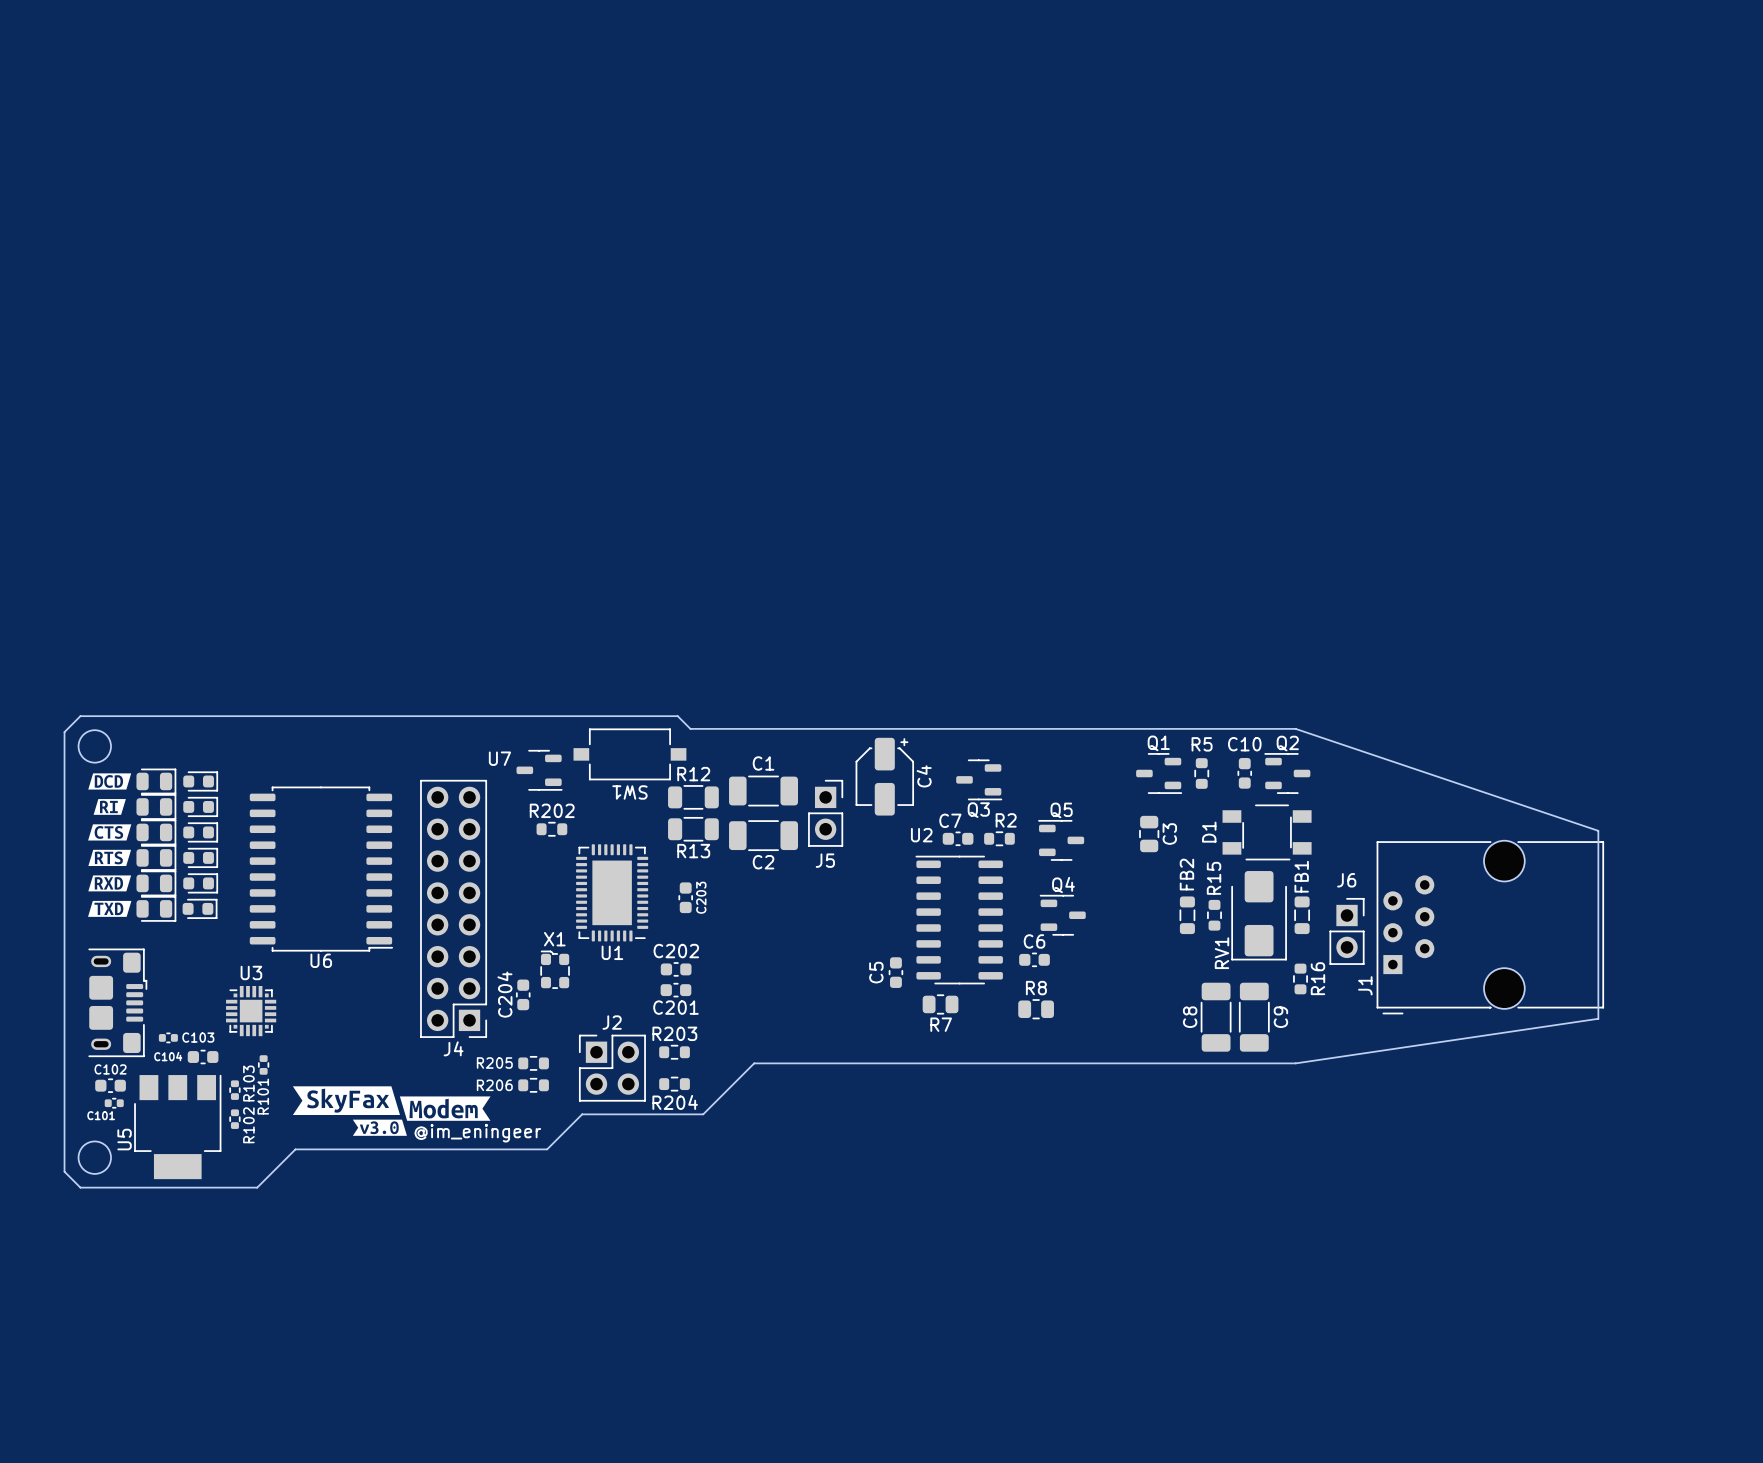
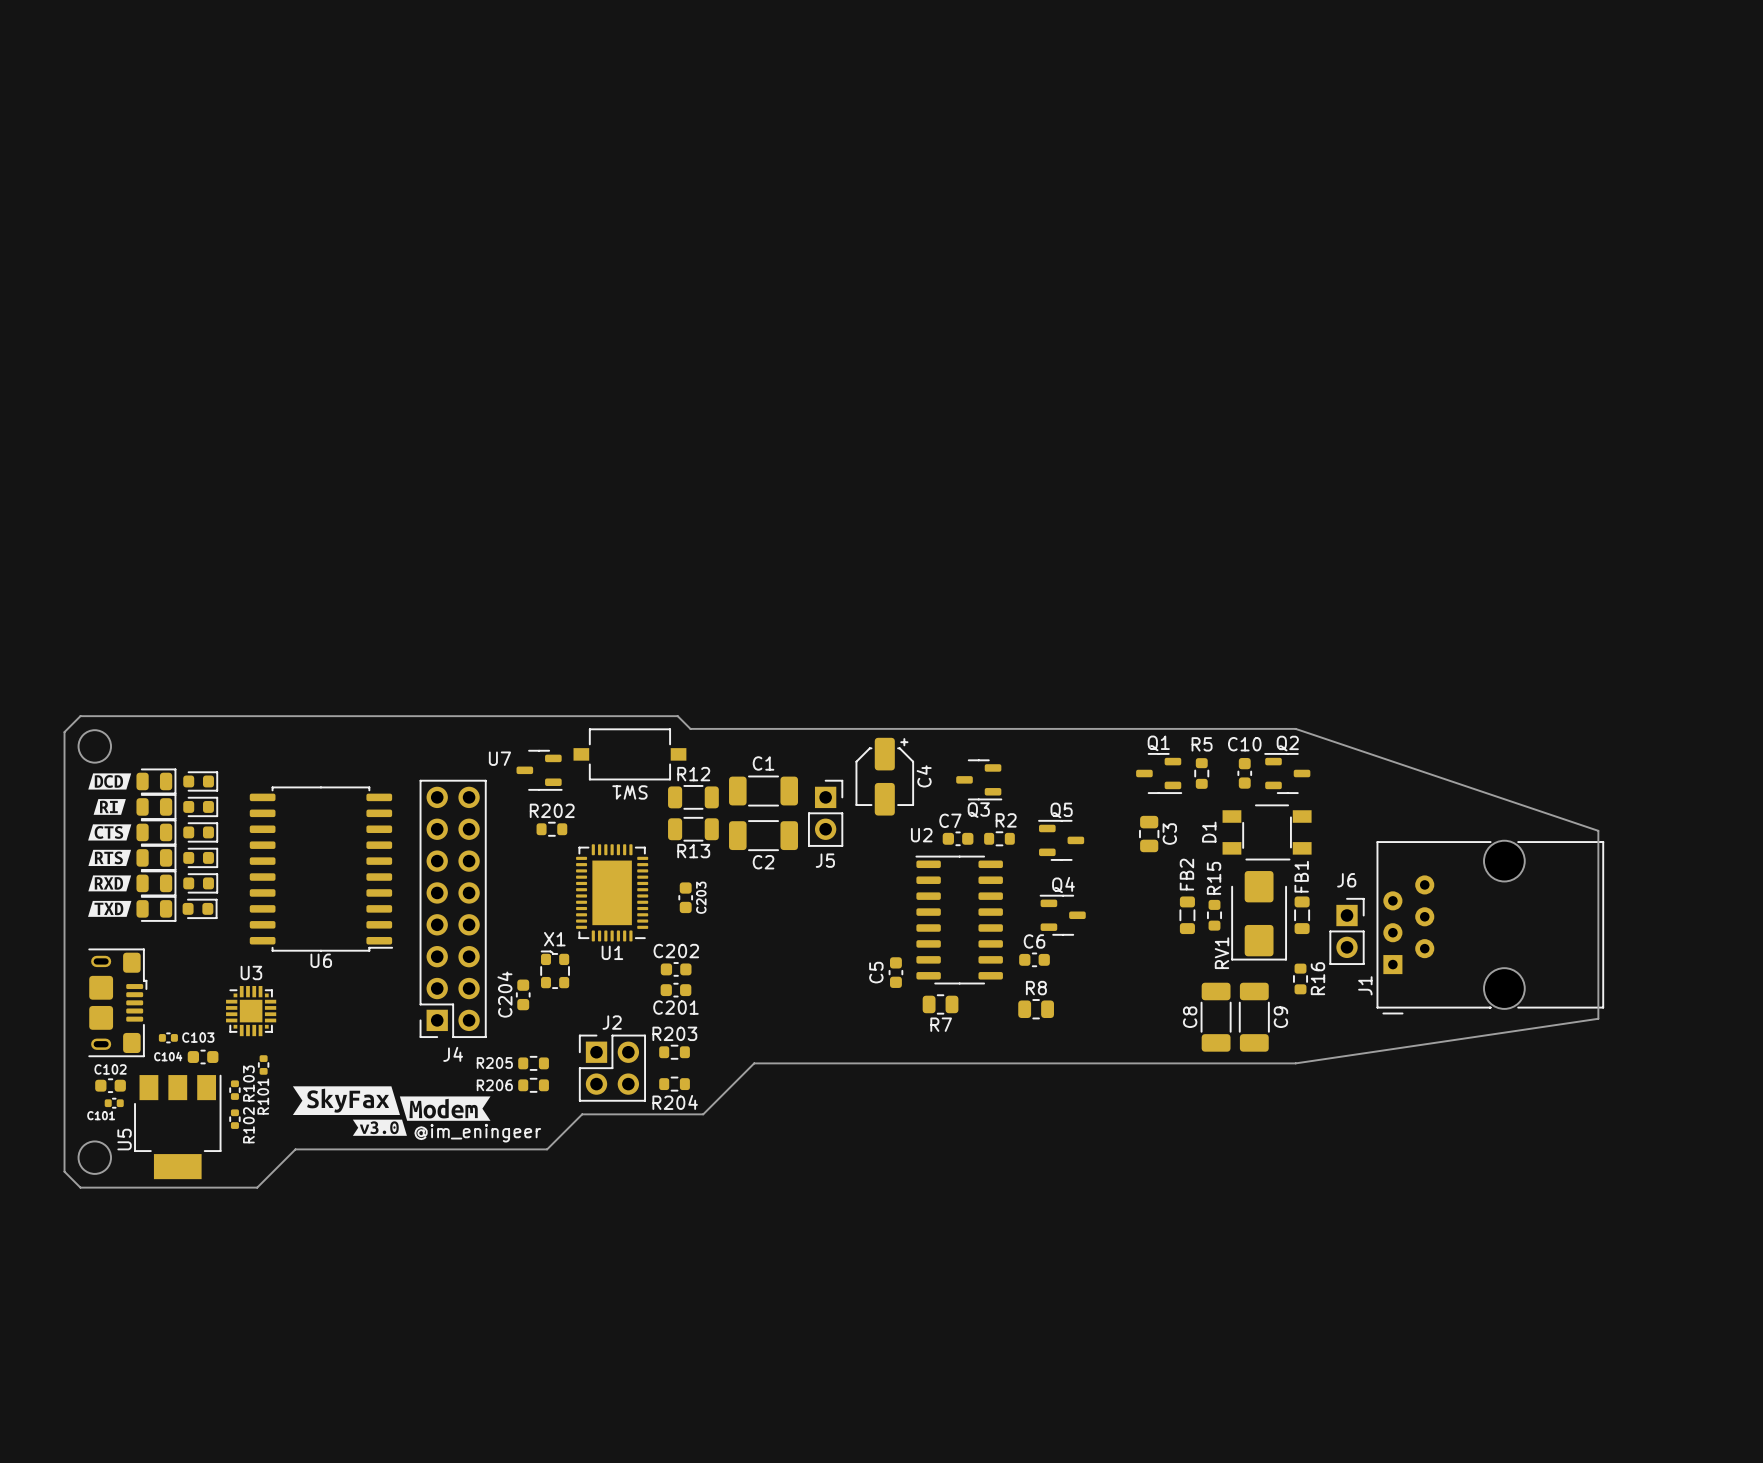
J4 footprint: [420, 779, 487, 1038] -> [419, 779, 487, 1038]

